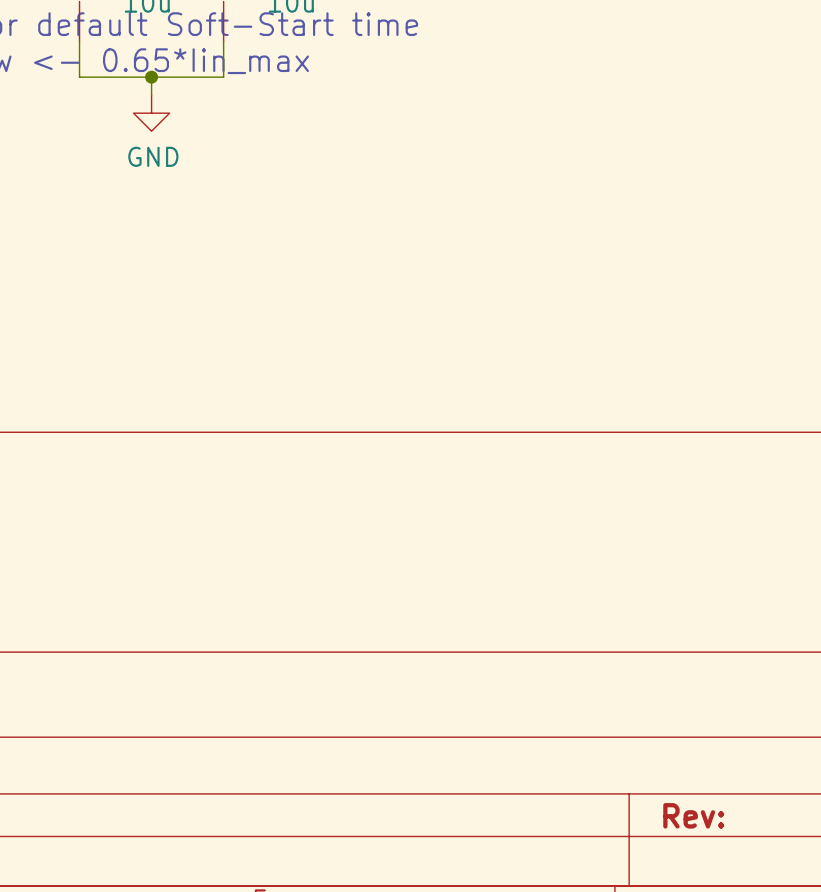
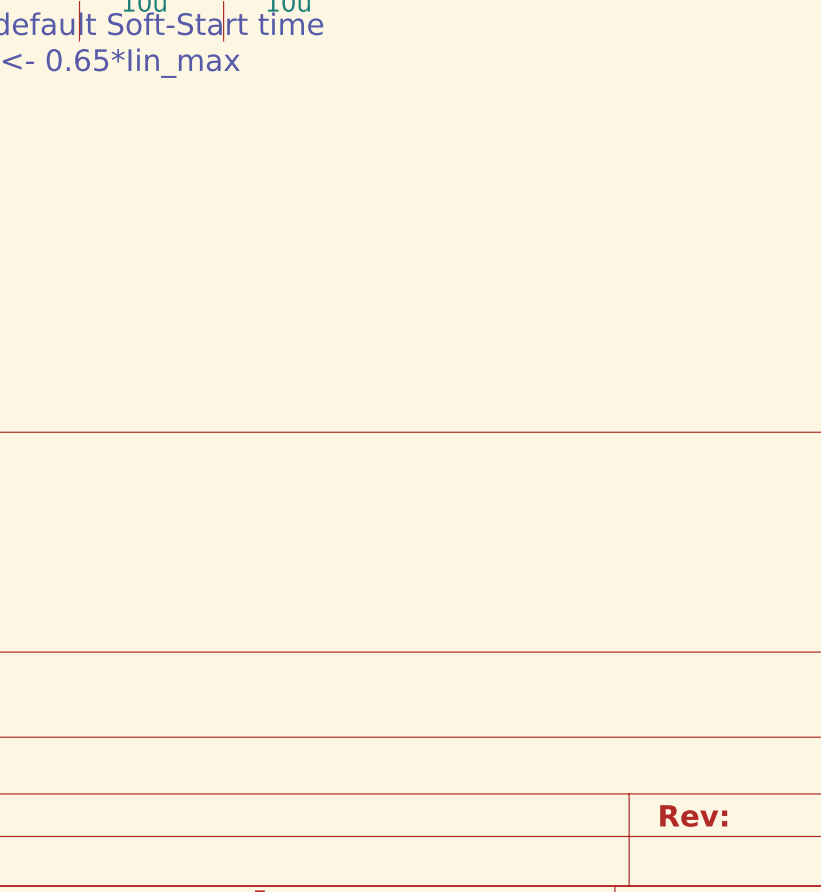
wire: (79, 41) (79, 77) (223, 77) (223, 41) -> none
wire: (151, 77) (151, 95) -> none
junction: (151, 77) -> none
power symbol: GND (151, 113) -> none

